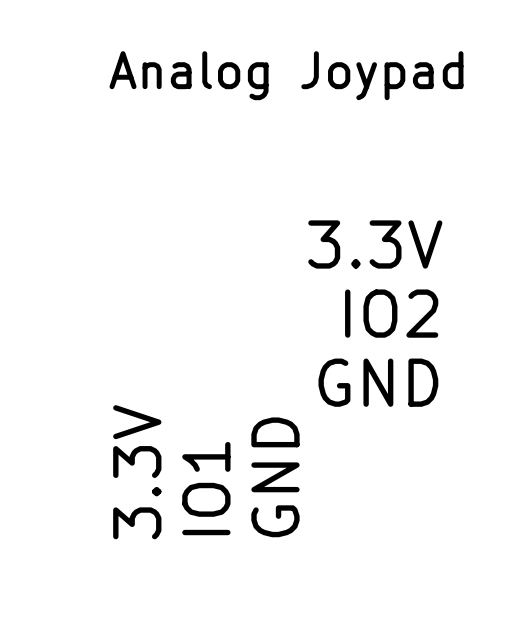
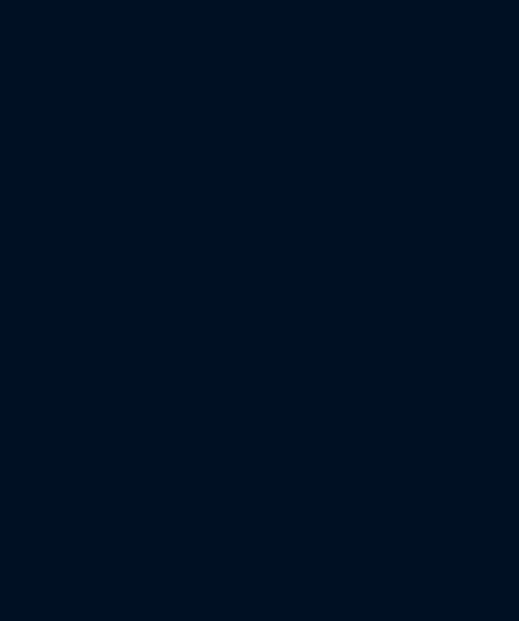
text: Analog Joypad (286, 75) -> none
text: 3.3V (375, 244) -> none
text: IO2 (391, 313) -> none
text: GND (378, 382) -> none
text: 3.3V (137, 472) -> none
text: GND (275, 477) -> none
text: IO1 (206, 488) -> none

